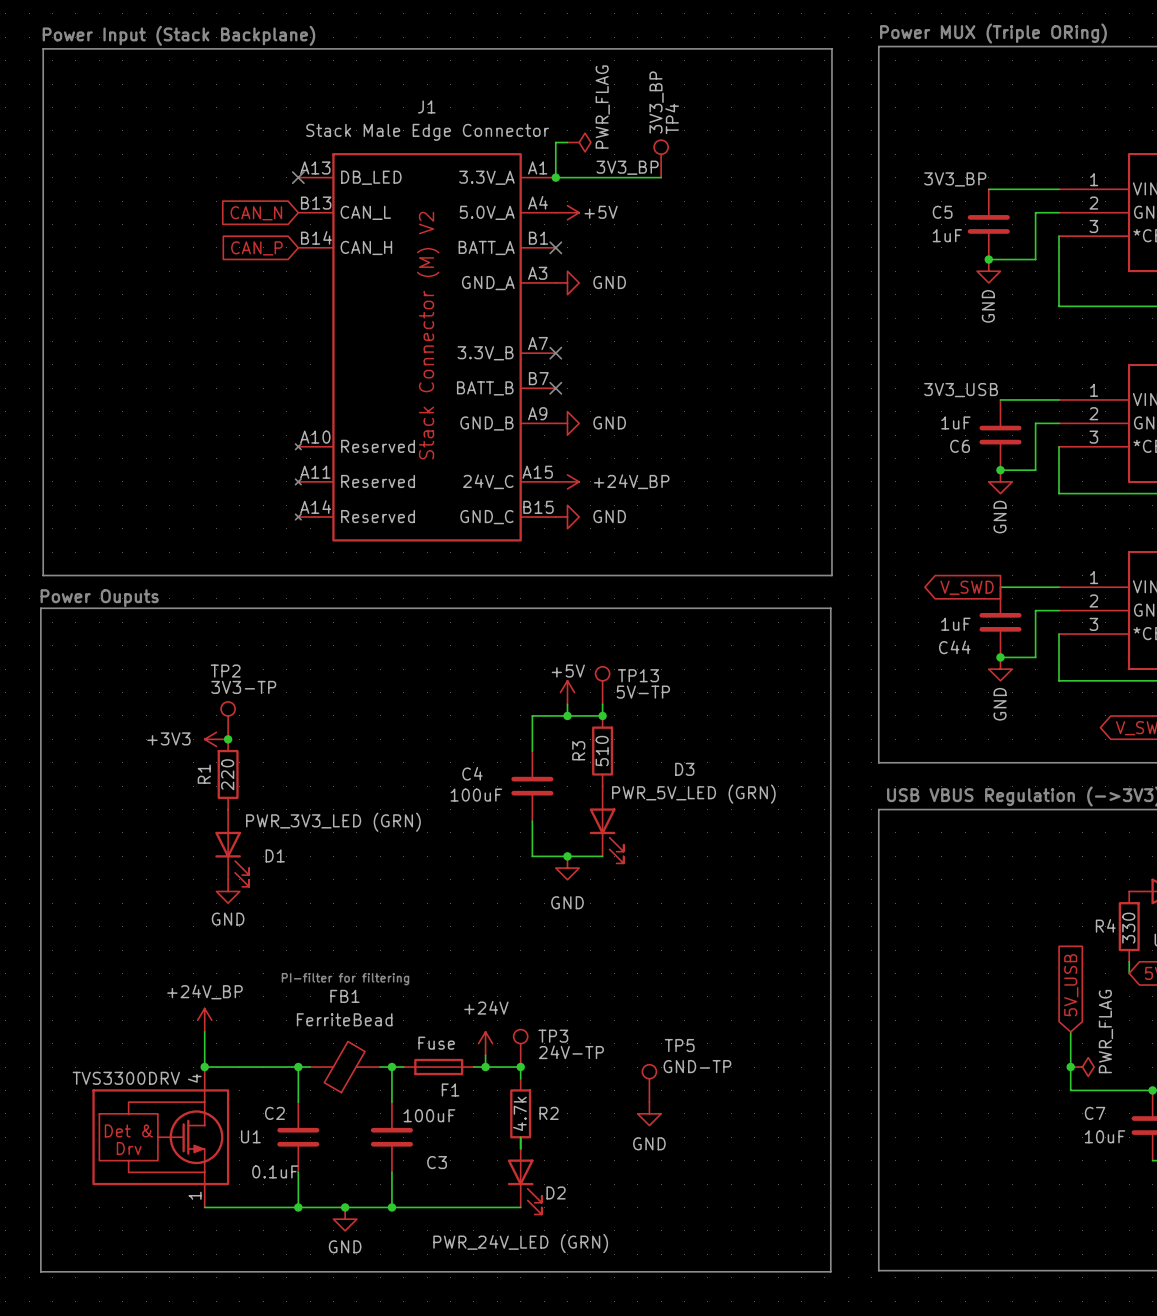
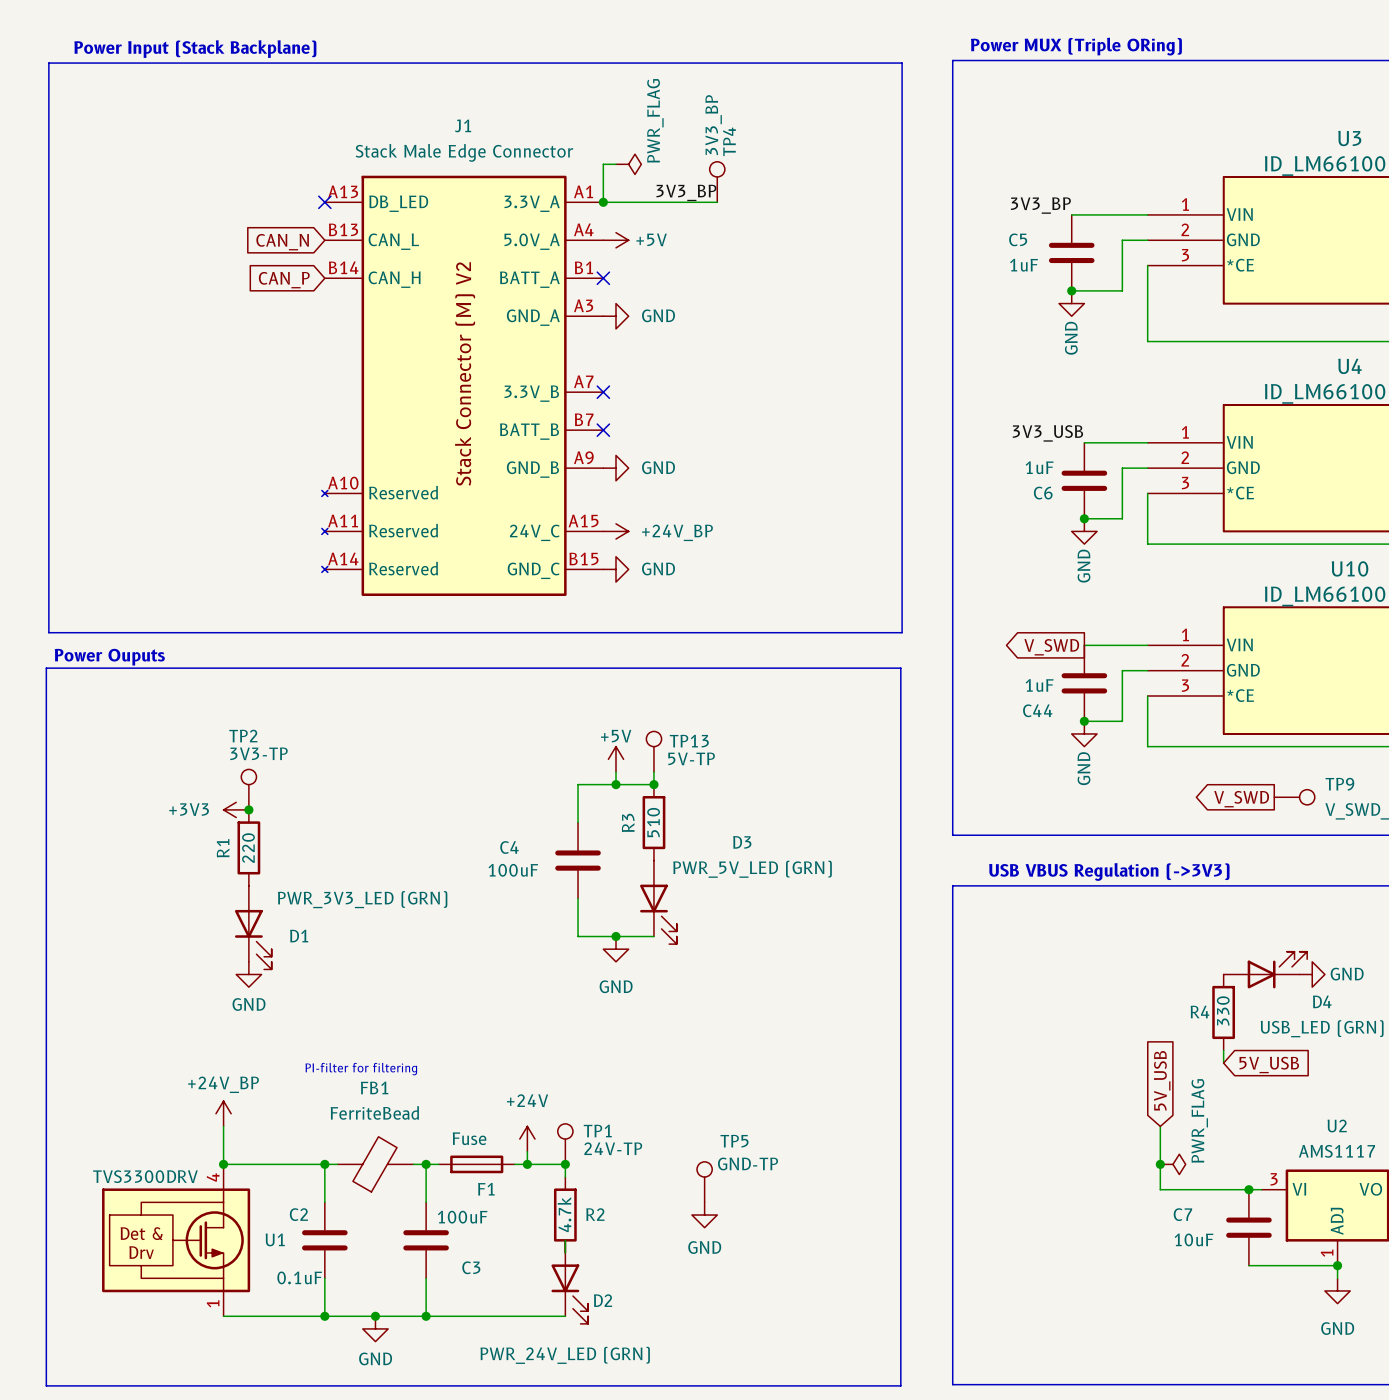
TP3 name: TP3 (553, 1036) -> TP1 (597, 1130)

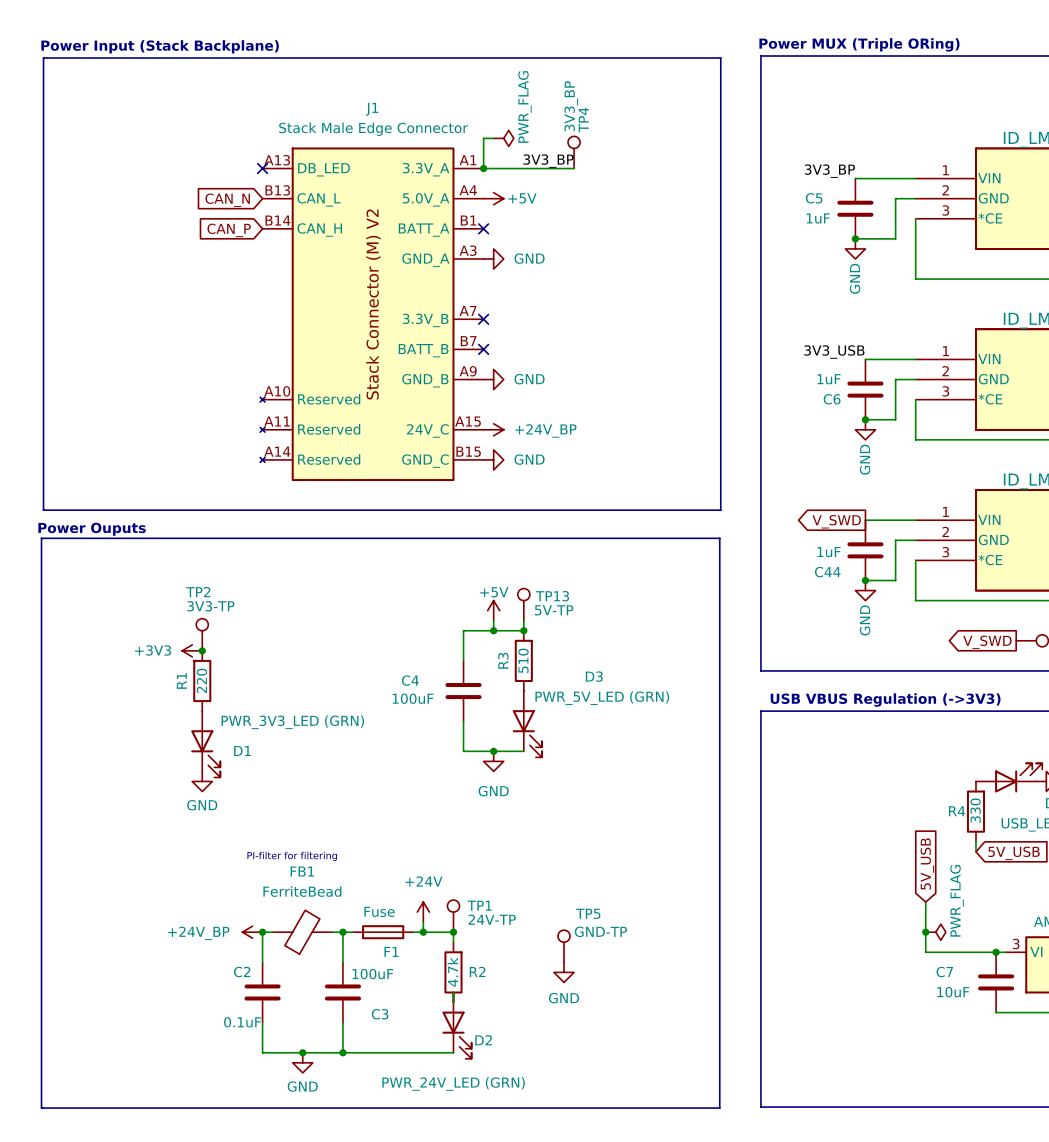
power symbol text position: +24V_BP (223, 1084) -> +24V_BP (198, 933)
power symbol rotation: 0° (223, 1113) -> 90° counterclockwise (252, 932)
power symbol position: +24V_BP (223, 1113) -> +24V_BP (252, 932)
wire: (223, 1126) (223, 1164) (324, 1164) -> none
junction: (223, 1164) -> none
U1: TVS3300DRV (176, 1240) -> none
wire: (223, 1316) (324, 1316) -> none
junction: (324, 1316) -> none

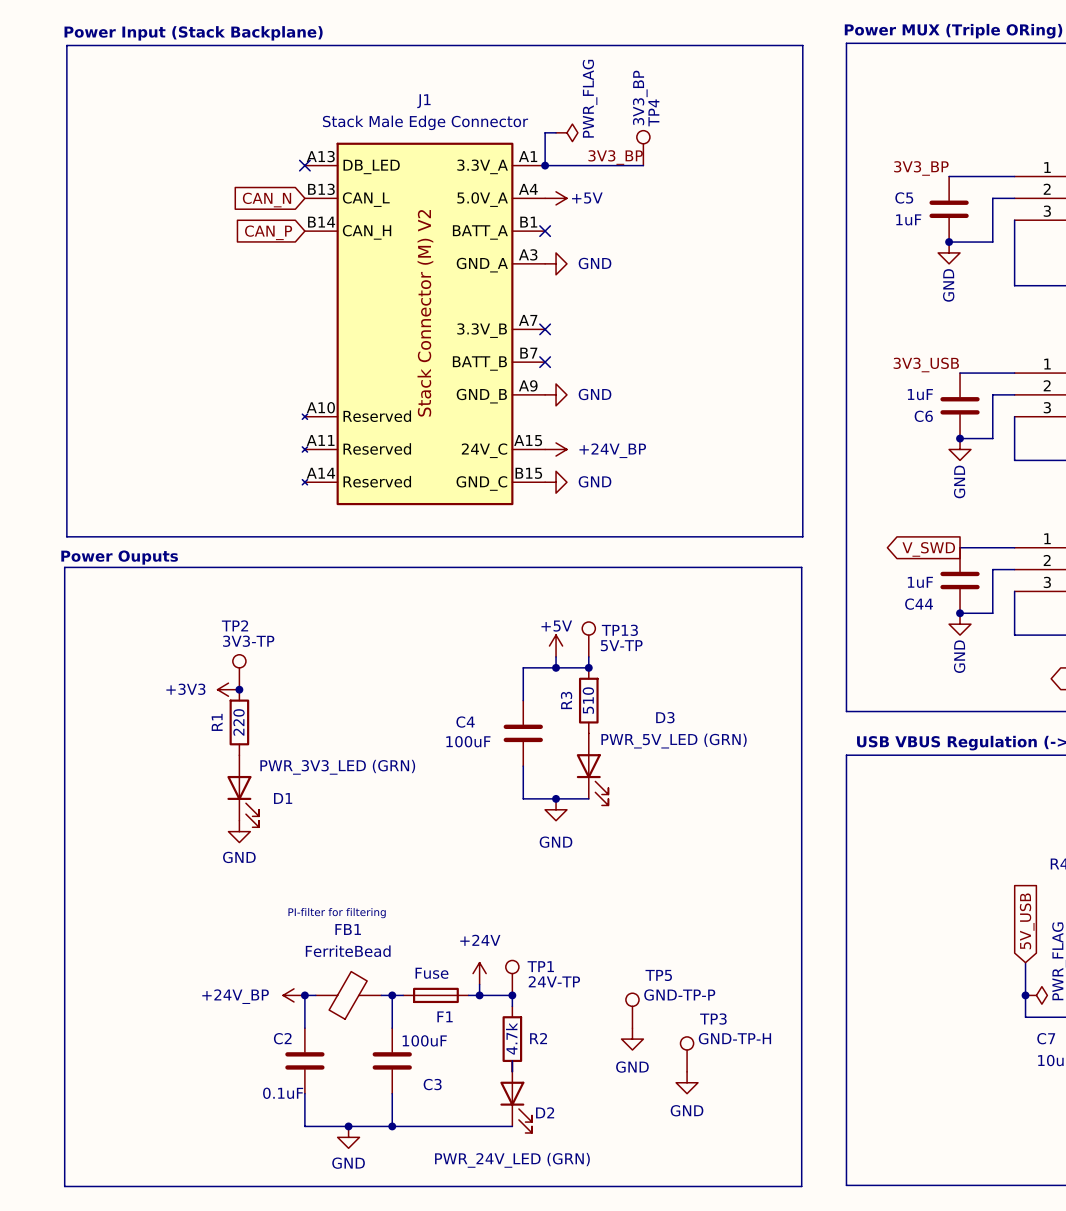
TP5 value: GND-TP (600, 931) -> GND-TP-P (679, 995)
TP3: none -> GND-TP-H (687, 1054)
power symbol: none -> GND (687, 1082)

